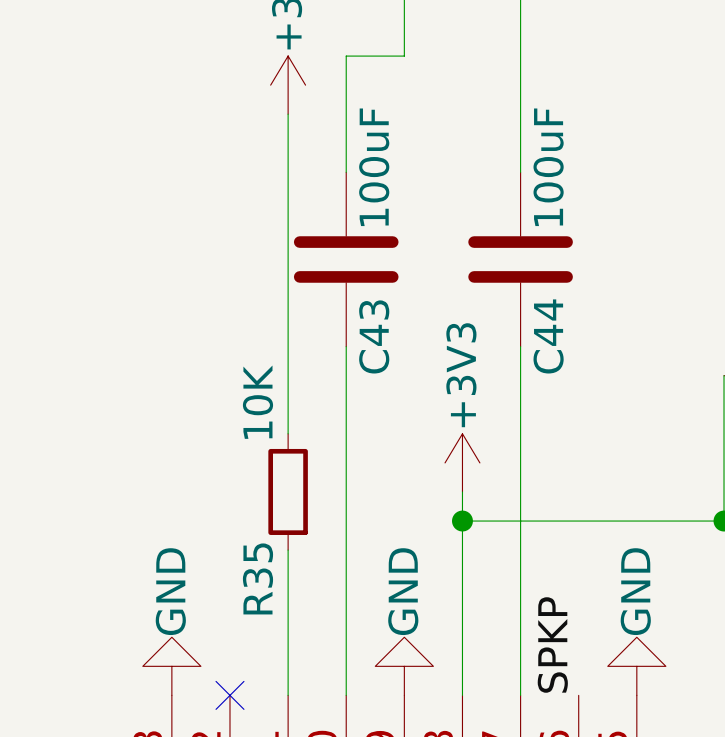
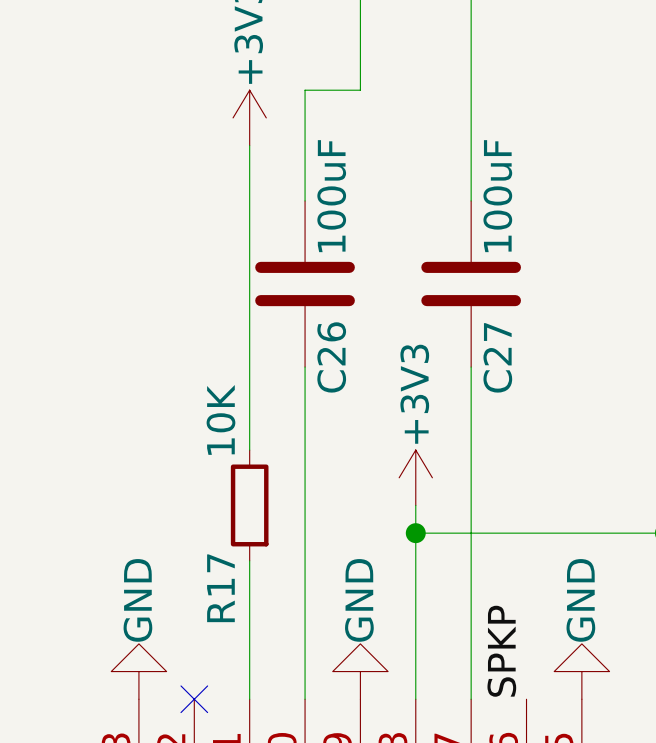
C43 name: C43 (374, 336) -> C26 (331, 357)
C44 name: C44 (548, 336) -> C27 (497, 357)
R35 name: R35 (257, 578) -> R17 (220, 588)

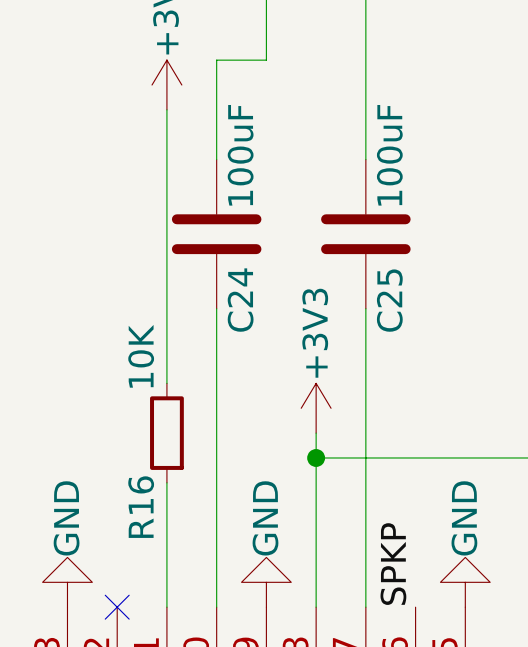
C26 name: C26 (331, 357) -> C24 (240, 300)
C27 name: C27 (497, 357) -> C25 (389, 300)
R17 name: R17 (220, 588) -> R16 (141, 507)

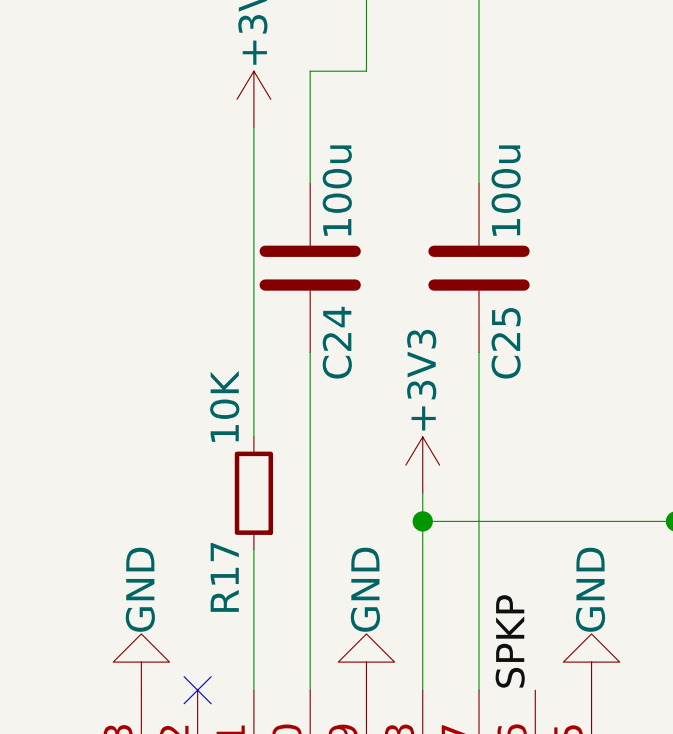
C24 value: 100uF (240, 155) -> 100u (337, 190)
C25 value: 100uF (389, 155) -> 100u (506, 190)
R16 name: R16 (141, 507) -> R17 (224, 577)

